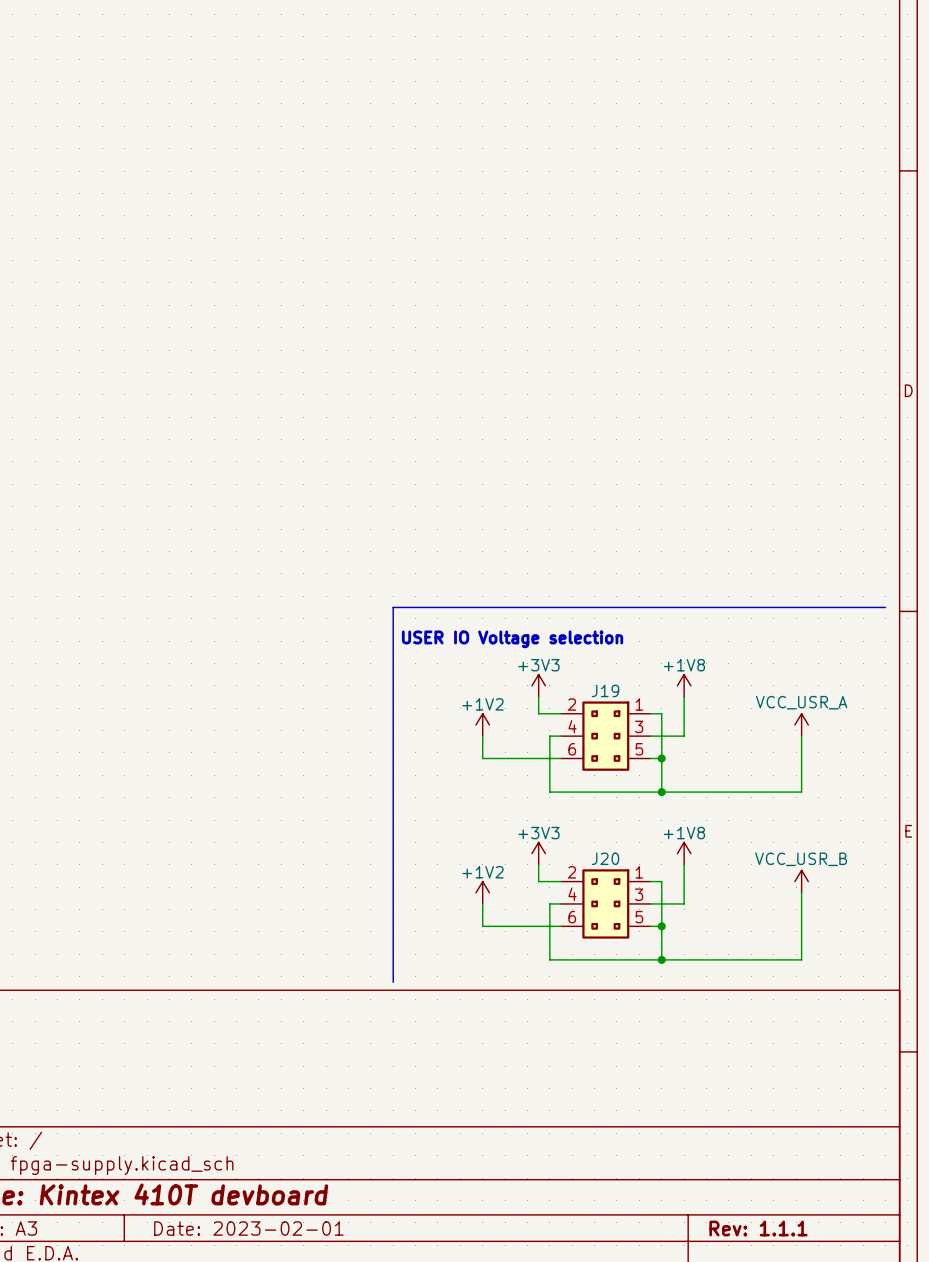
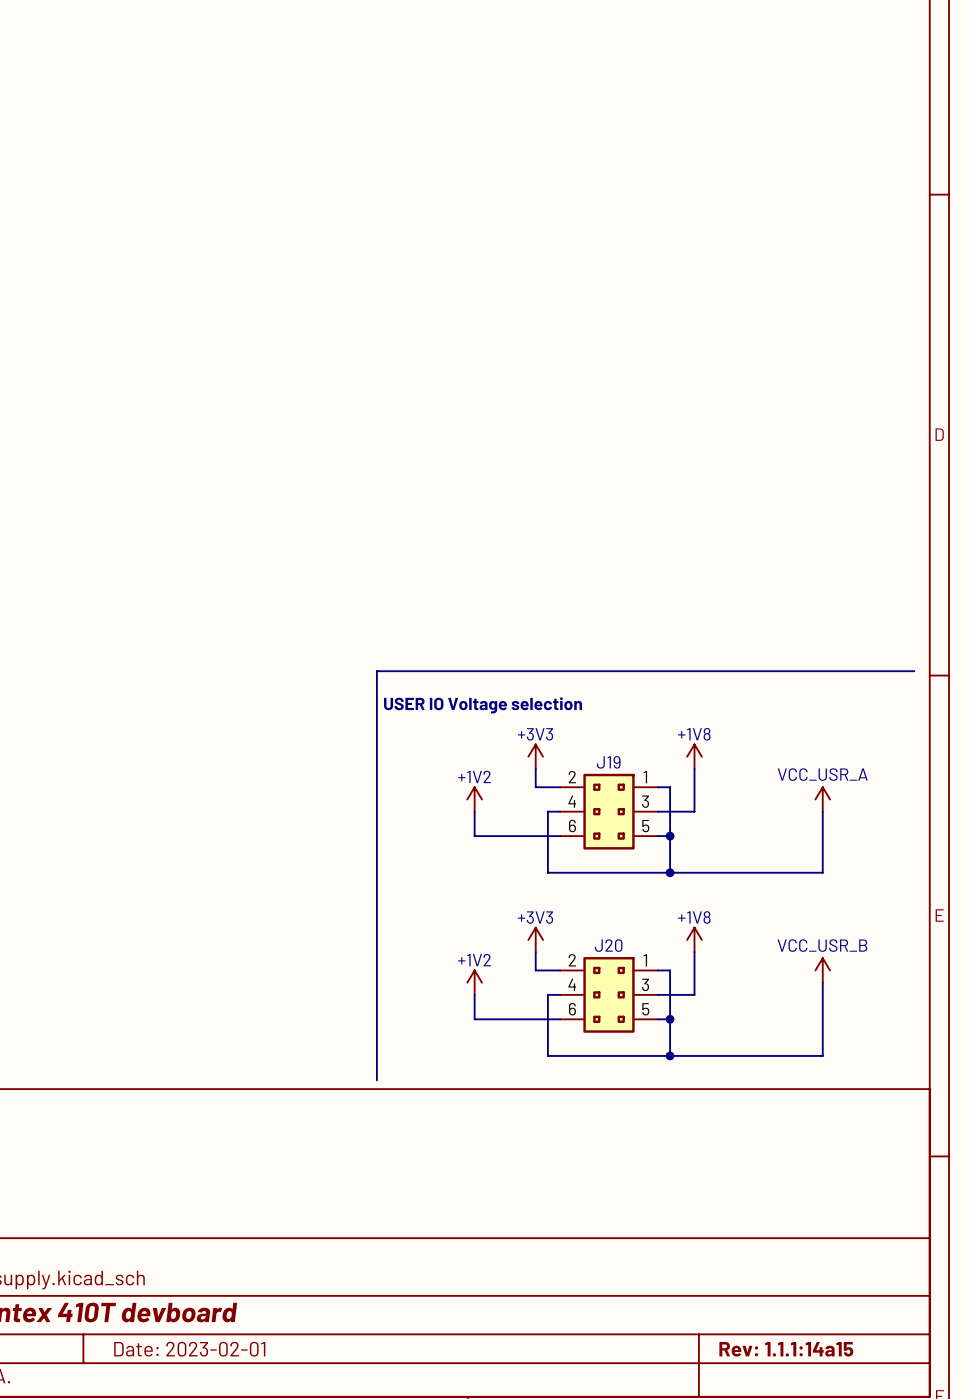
title block: Rev: 1.1.1 (758, 1228) -> Rev: 1.1.1:14a15 (786, 1349)

